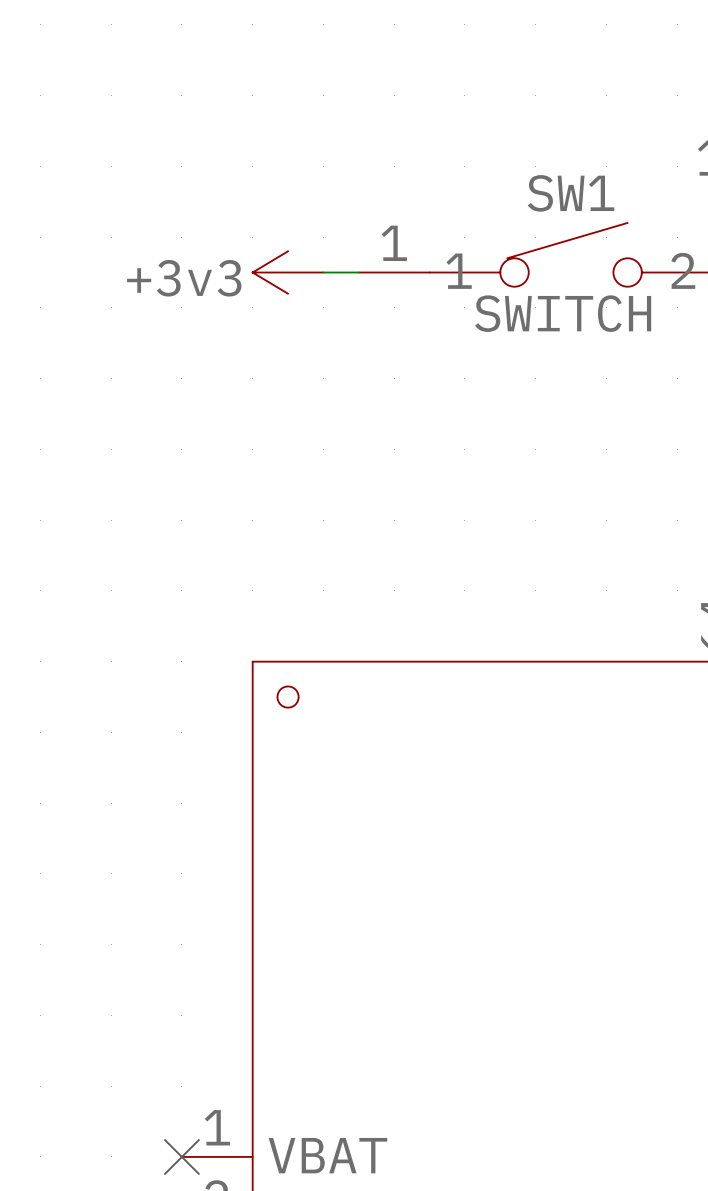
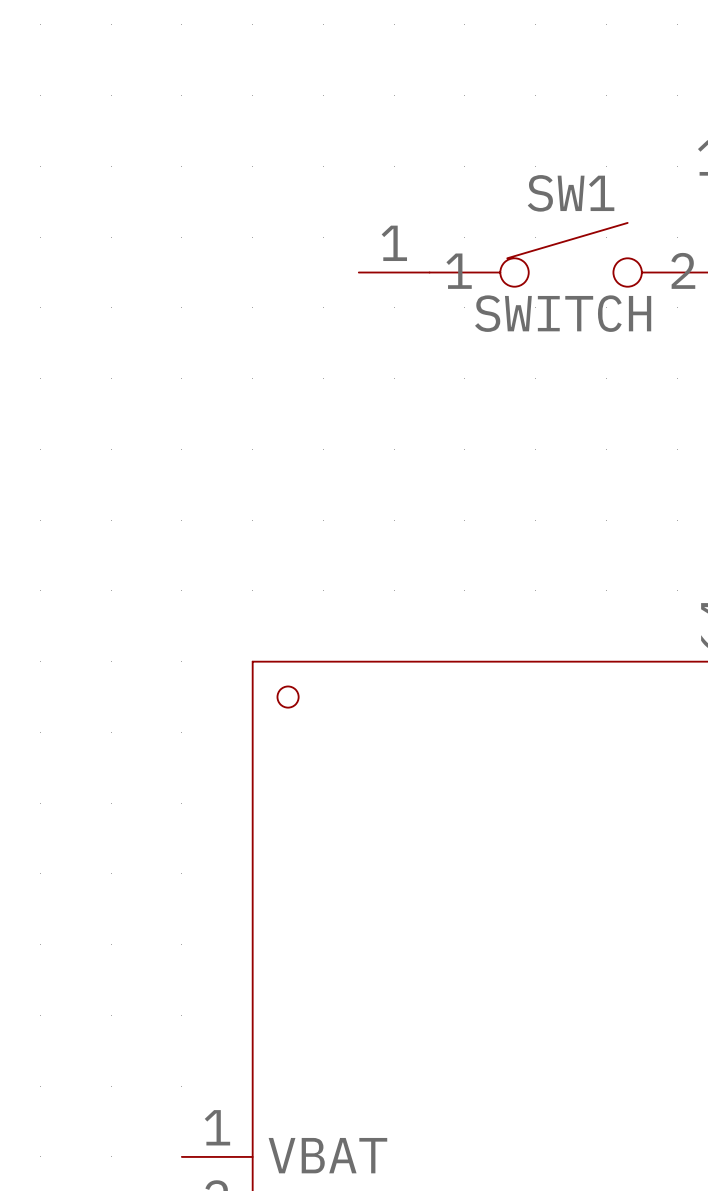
power symbol: +3v3 (288, 272) -> none
wire: (323, 272) (358, 272) -> none
no-connect mark: (181, 1156) -> none

